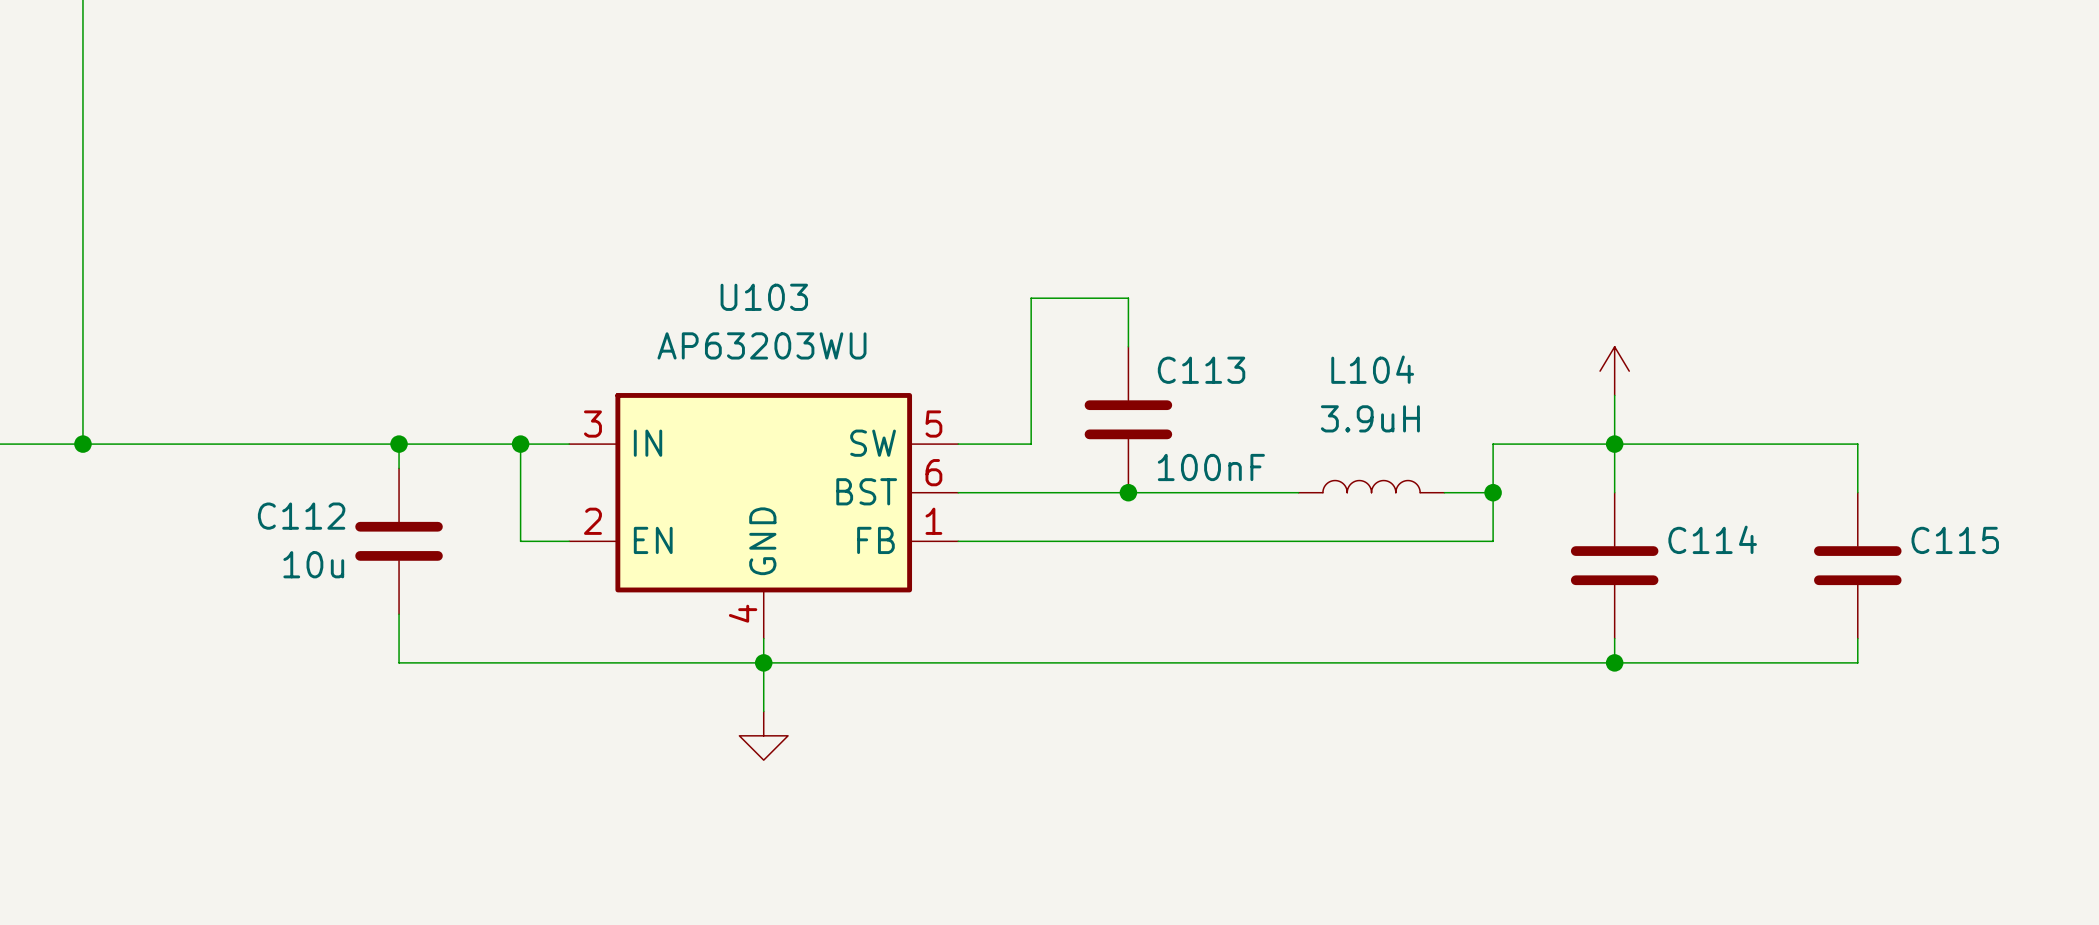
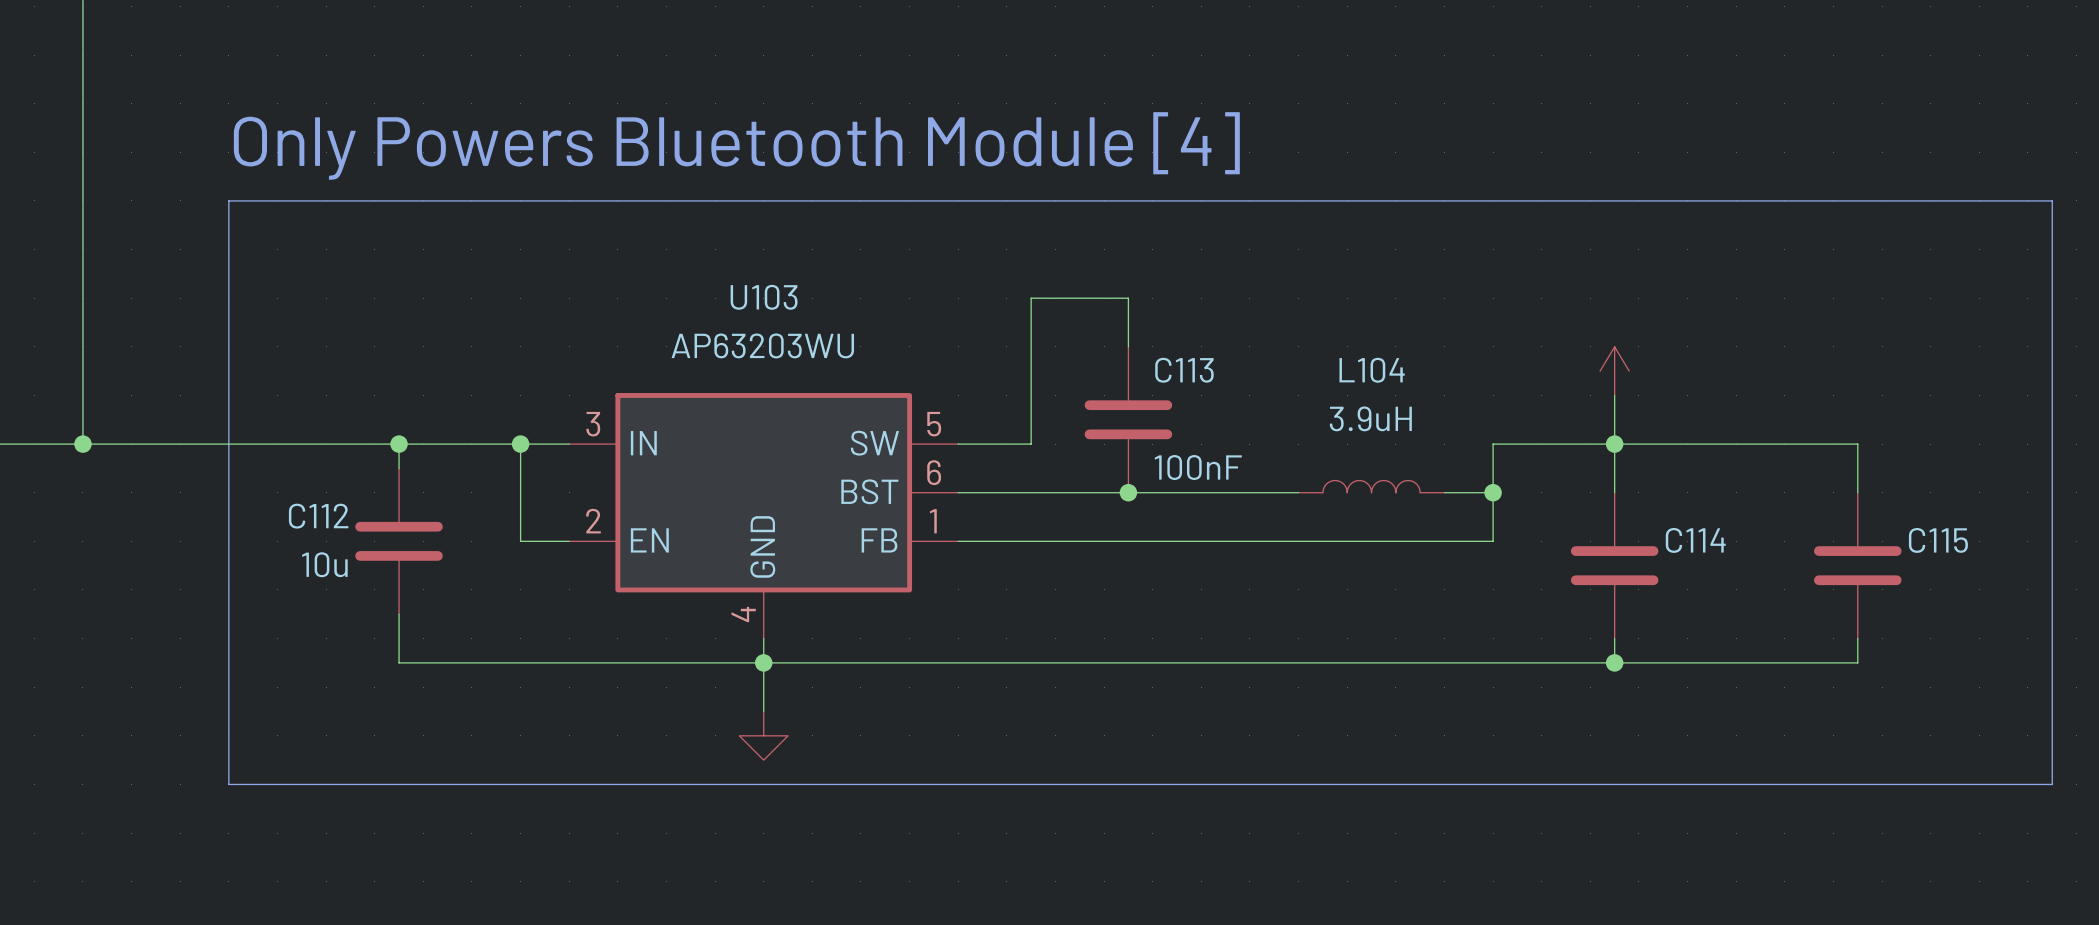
text: none -> Only Powers Bluetooth Module [4] (736, 145)
line: none -> (228, 200) (2052, 200) (2052, 784) (228, 784) (228, 200)

